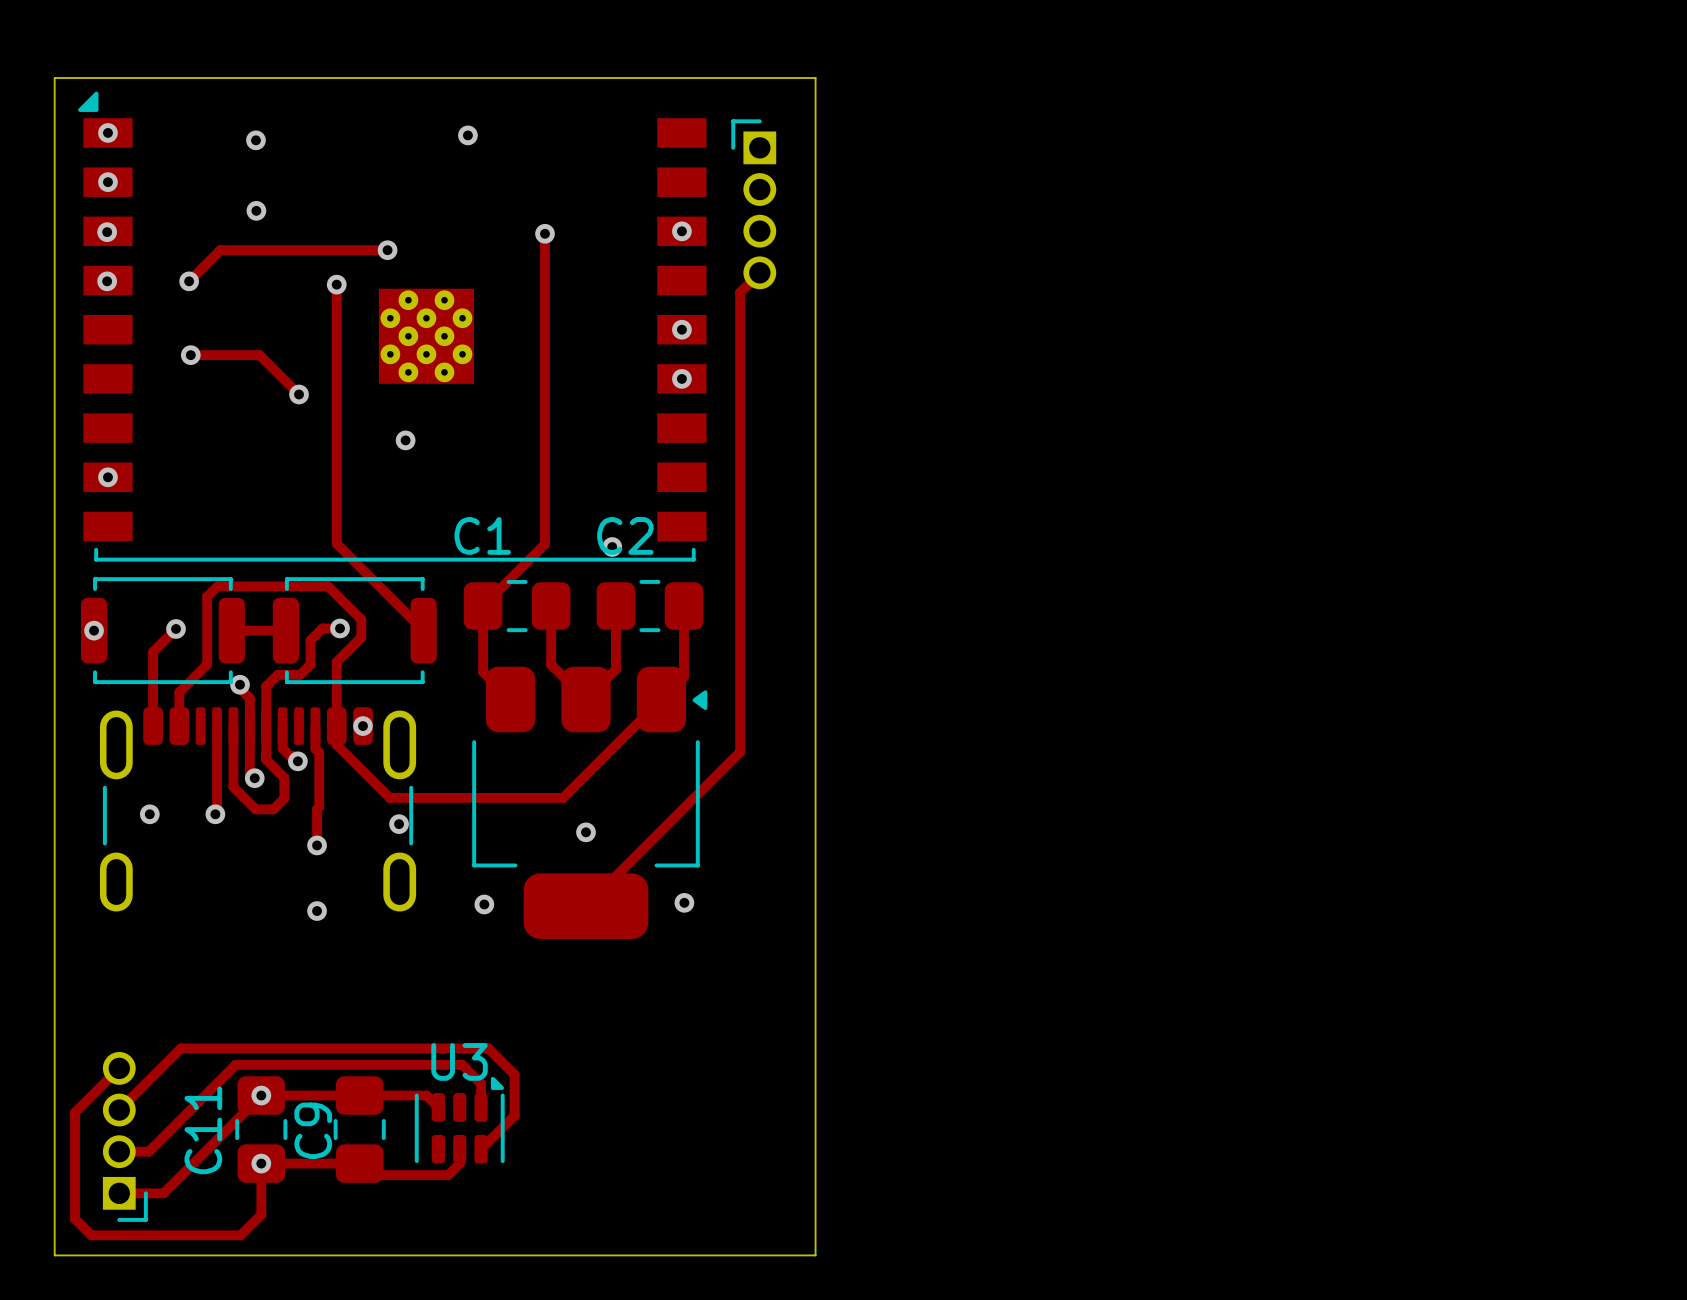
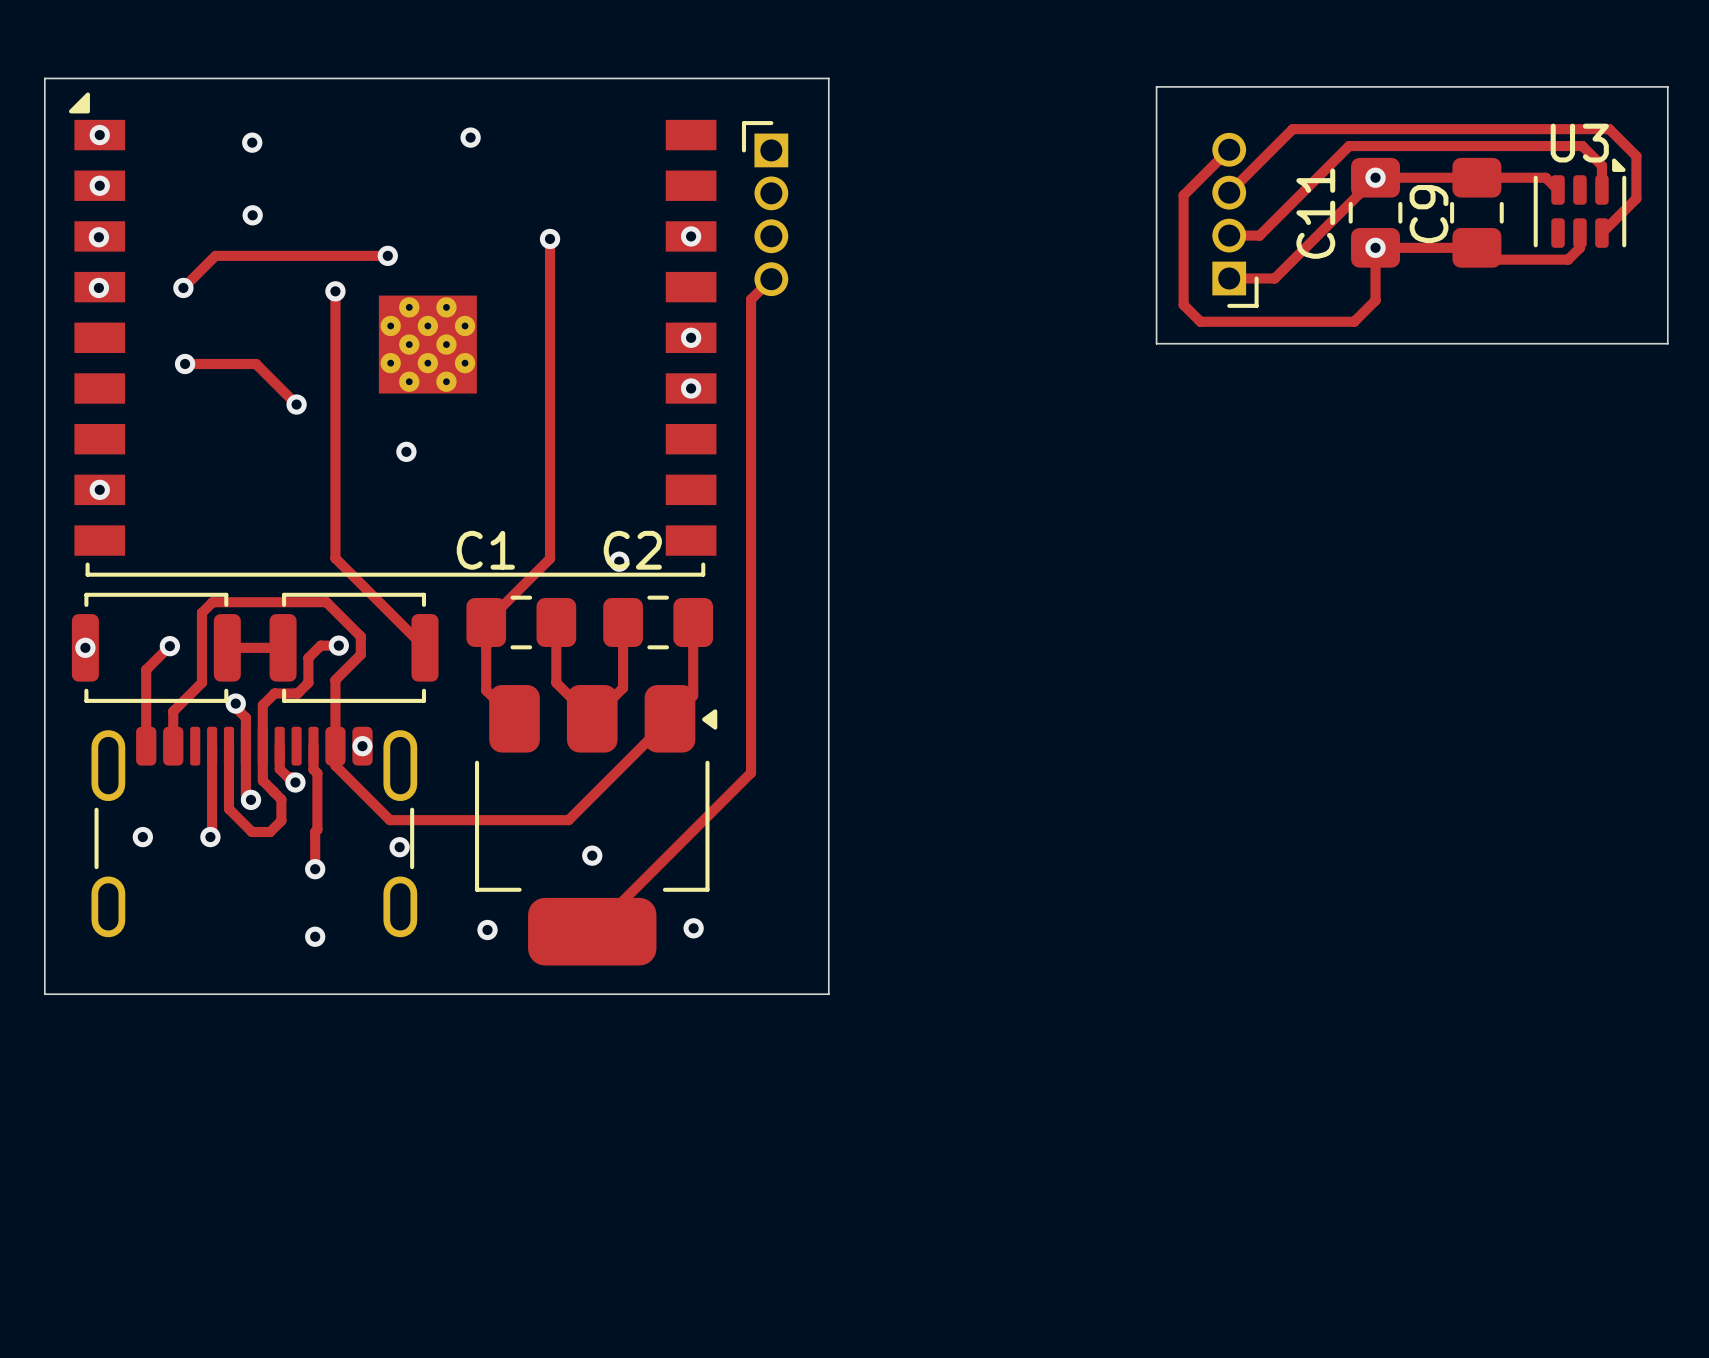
board edge: none -> (1156, 86) (1667, 86) (1667, 343) (1156, 343) (1156, 86)
track: none -> (1229, 149) (1183, 195) (1183, 304) (1200, 321) (1354, 321) (1375, 300) (1375, 247) (1476, 247) (1488, 259) (1568, 259) (1579, 247) (1579, 233)
track: none -> (1375, 177) (1545, 177) (1558, 189)
track: none -> (1375, 177) (1274, 278) (1229, 278)
via: none -> (1375, 177)
track: none -> (1601, 189) (1601, 165) (1582, 146) (1349, 146) (1259, 235) (1229, 235)
track: none -> (1229, 192) (1292, 129) (1609, 129) (1636, 156) (1636, 198) (1601, 233)
part: none -> (1235, 220)
via: none -> (1375, 247)
board edge: (54, 966) (54, 1255) (815, 1255) (815, 966) -> (44, 994) (828, 994)
track: (119, 1068) (75, 1112) (75, 1218) (91, 1235) (240, 1235) (261, 1214) (261, 1163) (359, 1163) (371, 1175) (448, 1175) (459, 1163) (459, 1149) -> none
track: (261, 1095) (426, 1095) (438, 1107) -> none
track: (261, 1095) (163, 1193) (119, 1193) -> none
via: (261, 1095) -> none
track: (481, 1107) (481, 1083) (462, 1064) (235, 1064) (148, 1151) (119, 1151) -> none
track: (119, 1110) (180, 1048) (488, 1048) (514, 1074) (514, 1115) (481, 1149) -> none
U3 position: (459, 1120) -> (1579, 203)
C9 position: (261, 1129) -> (1375, 212)
C11 position: (359, 1129) -> (1476, 212)
part: (125, 1136) -> none
via: (261, 1163) -> none

